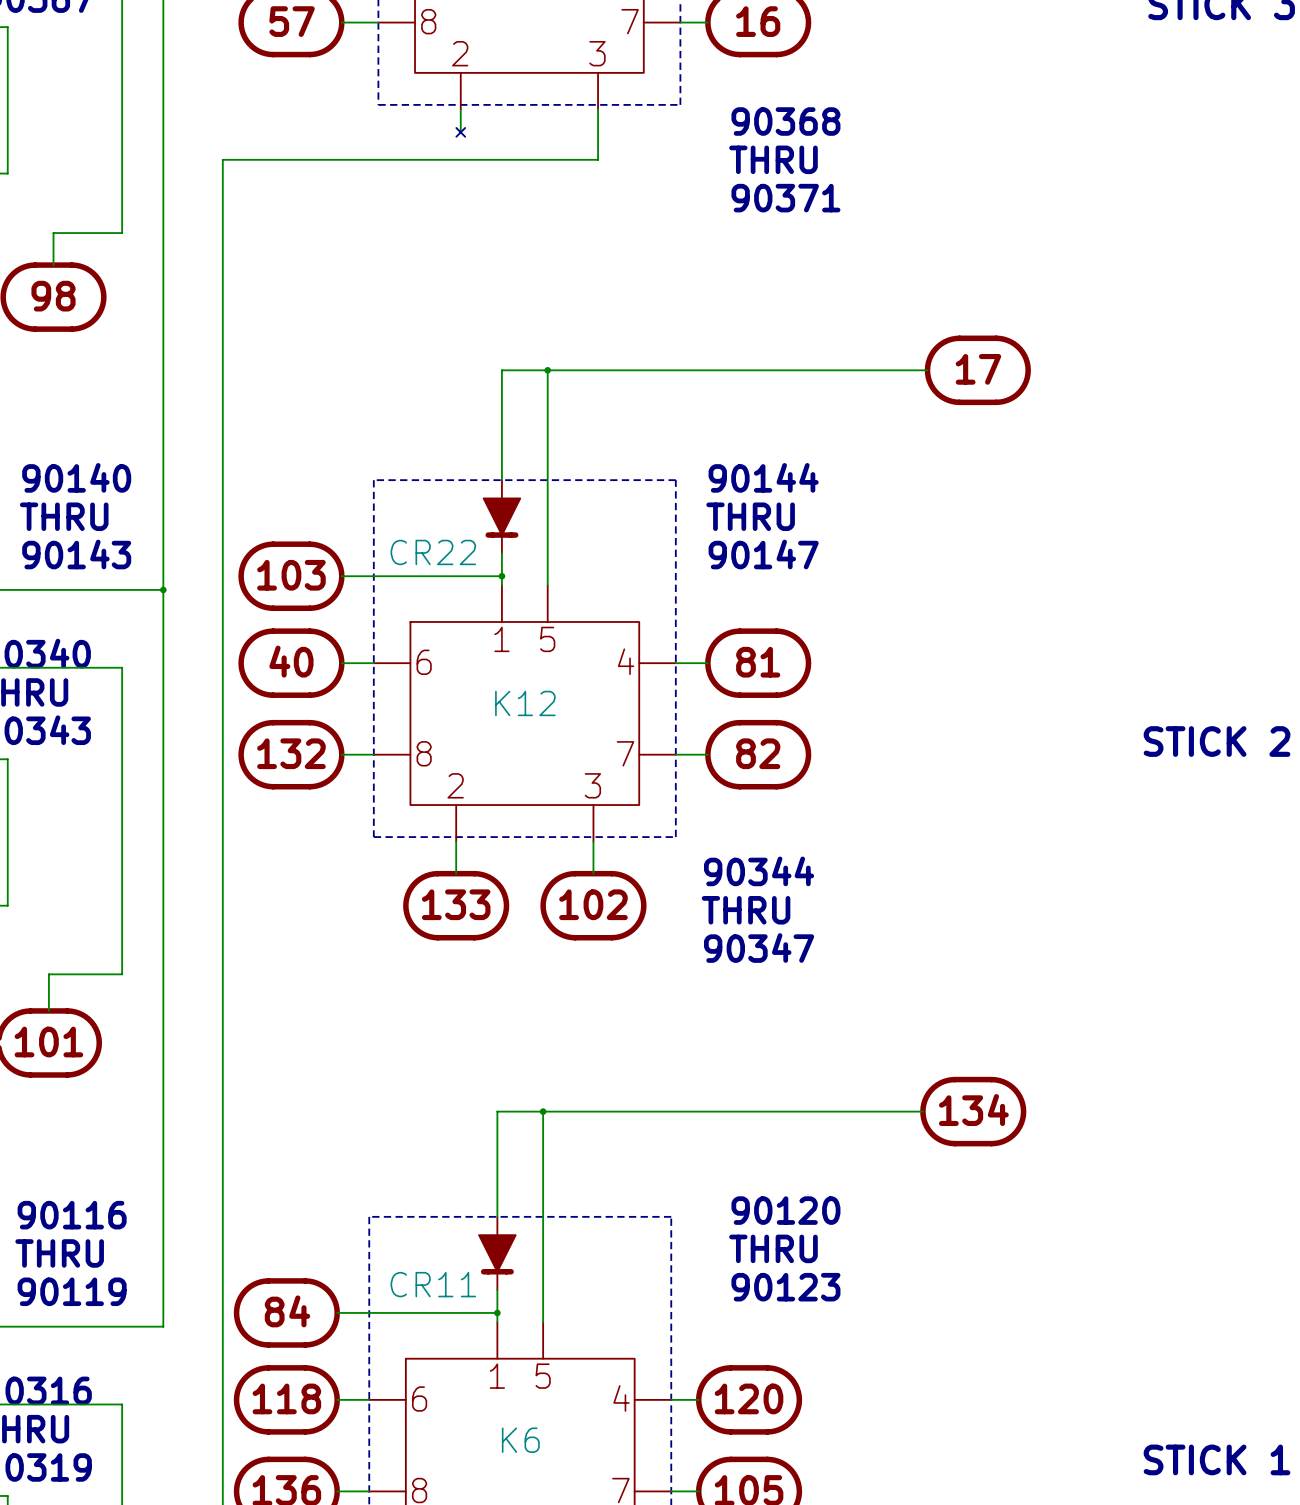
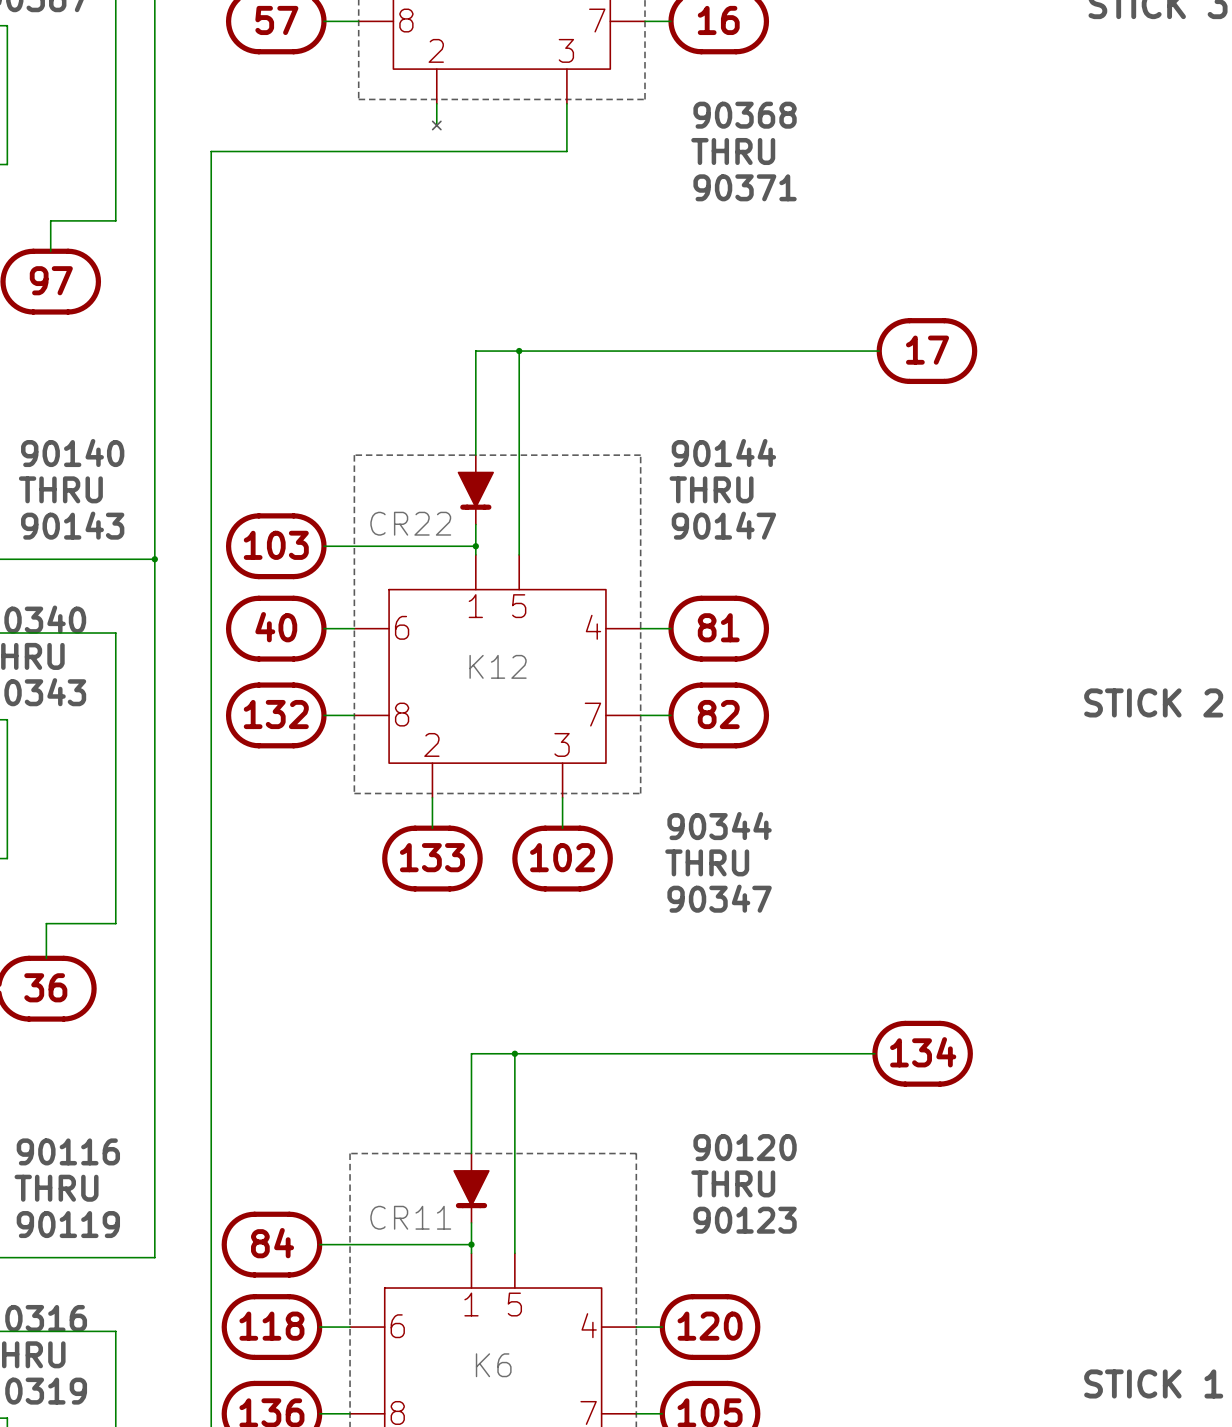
part text: 98 (53, 296) -> 97 (51, 280)
part text: 101 (48, 1042) -> 36 (45, 987)

